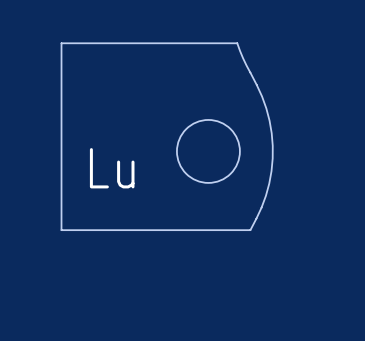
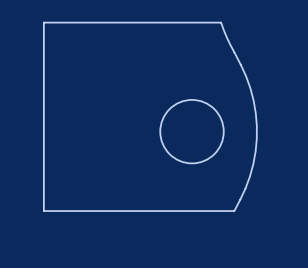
text: Lu (112, 168) -> none

